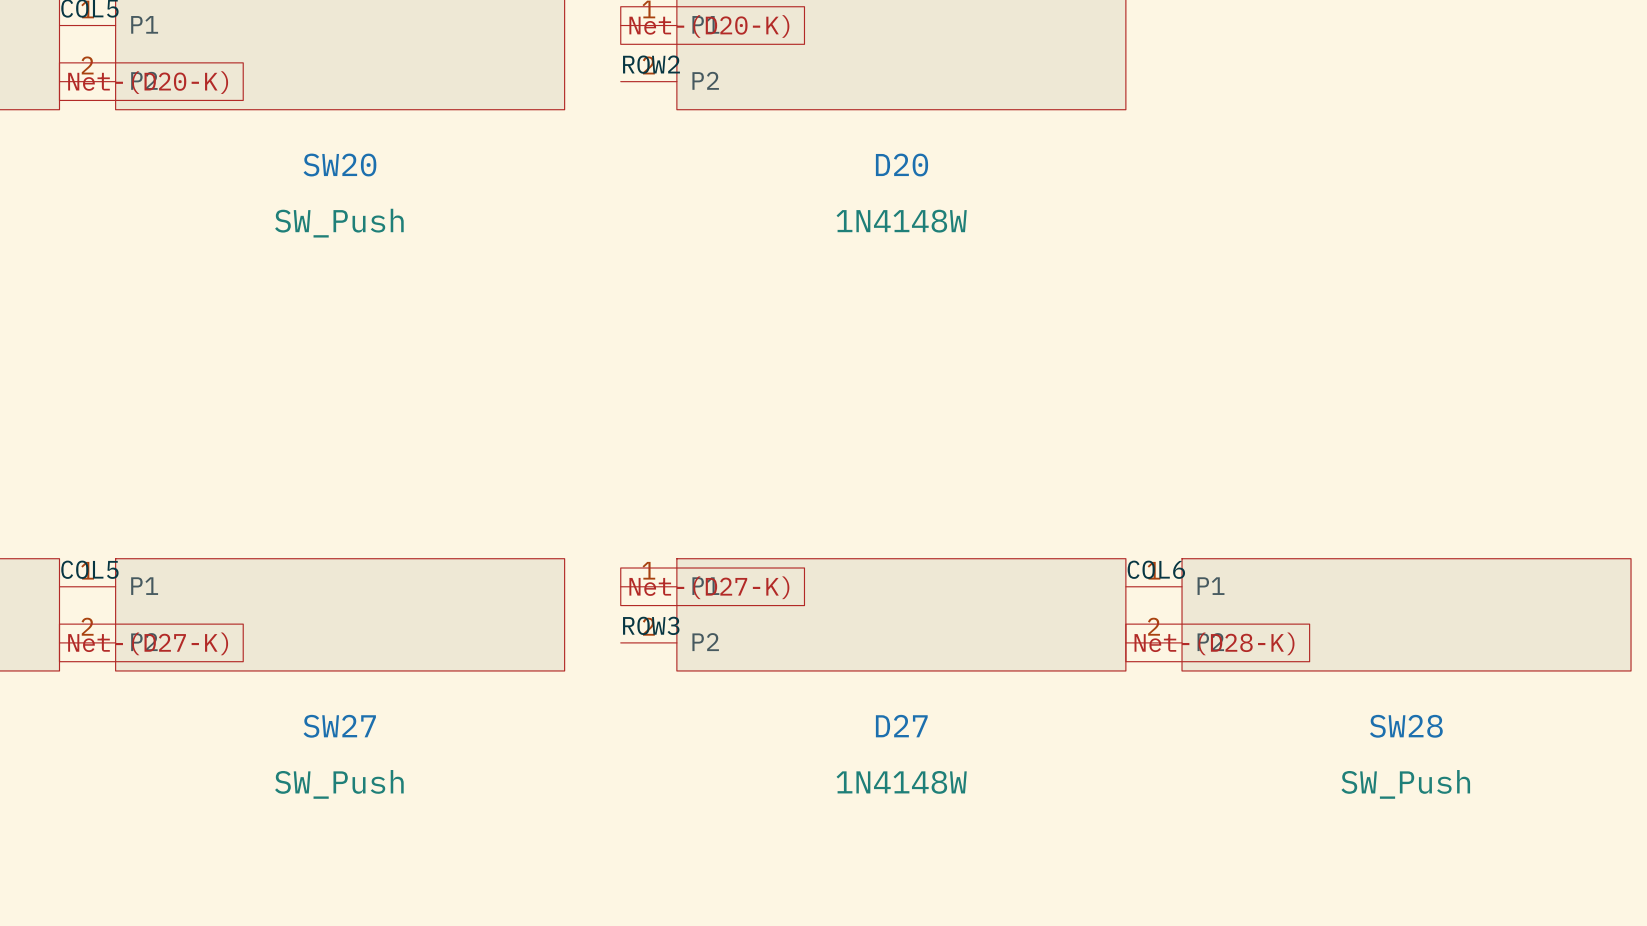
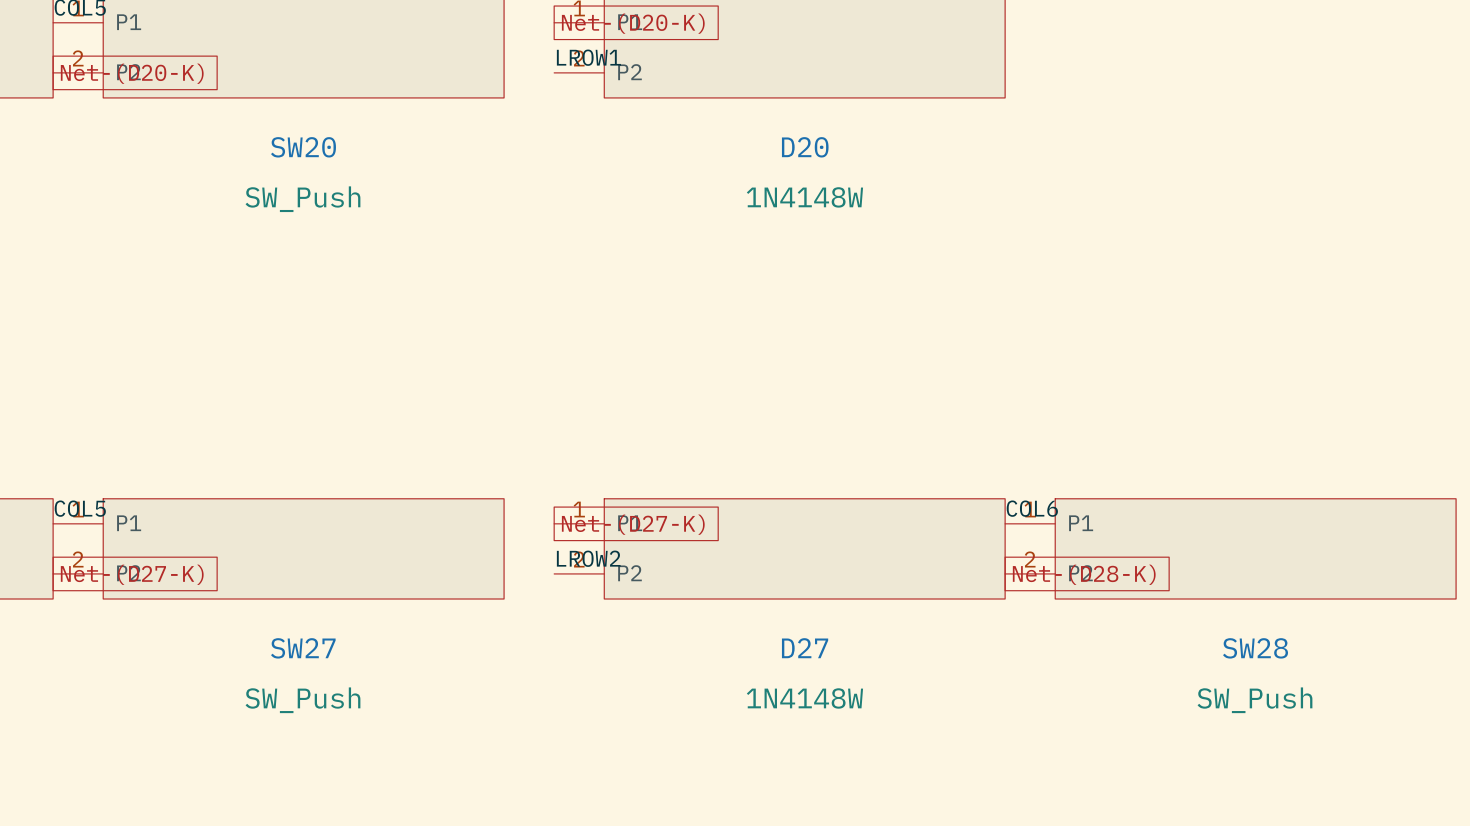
label: ROW2 (651, 64) -> LROW1 (588, 57)
label: ROW3 (651, 625) -> LROW2 (588, 558)

